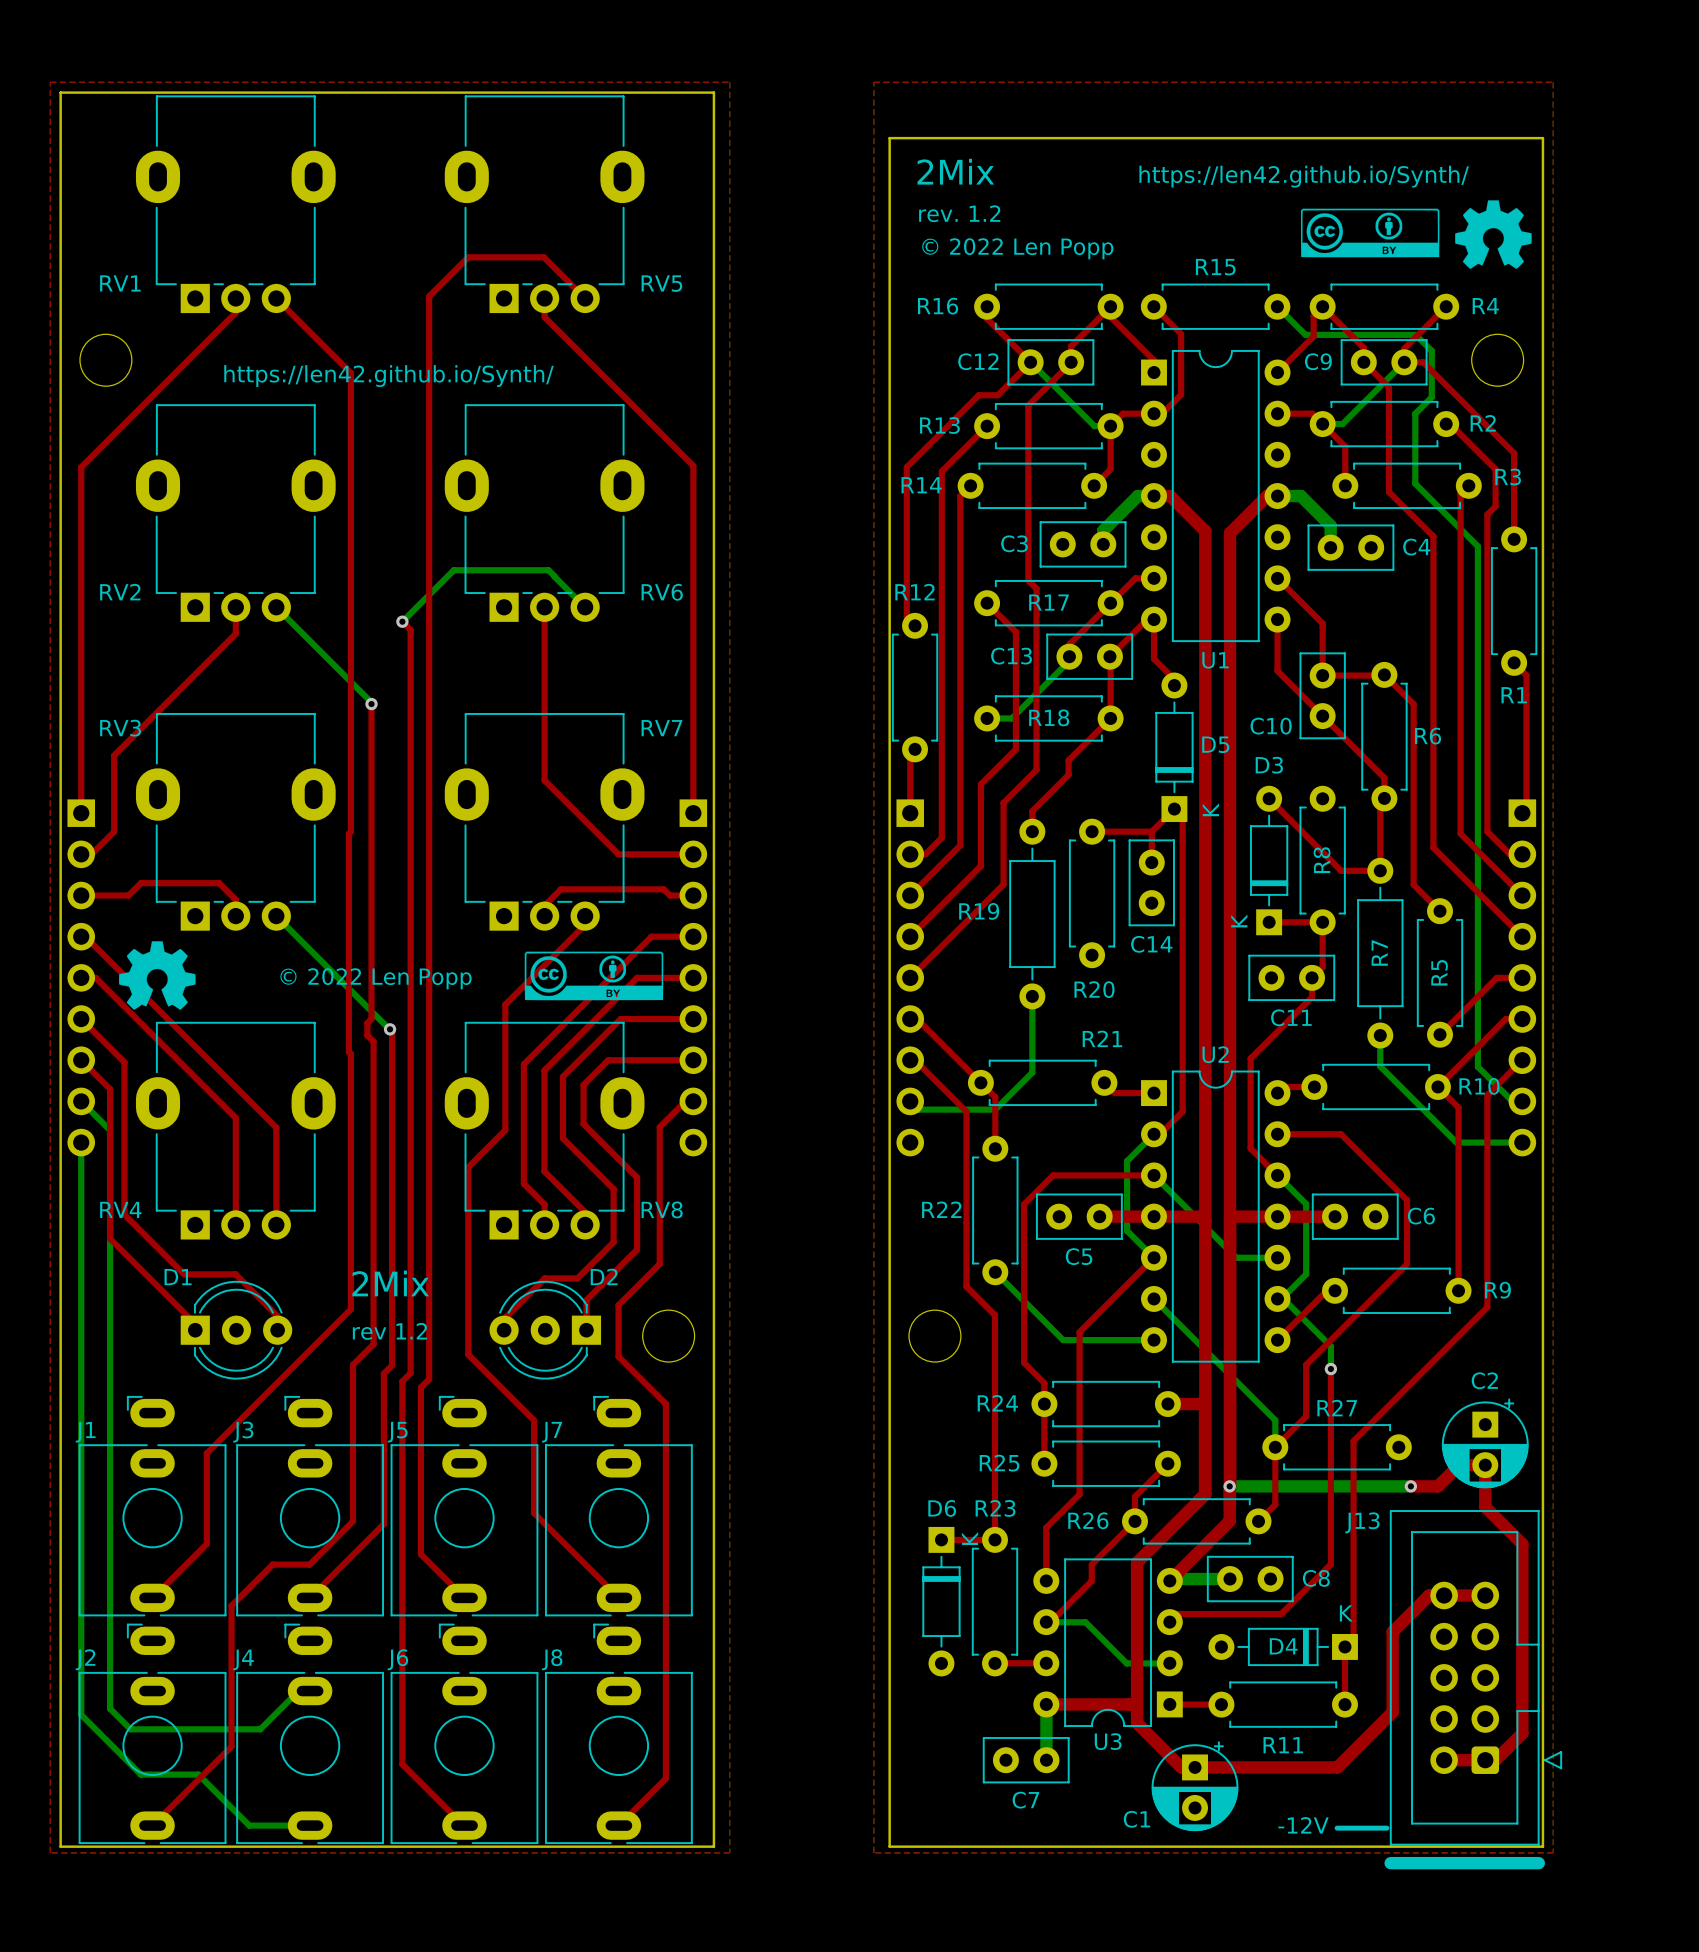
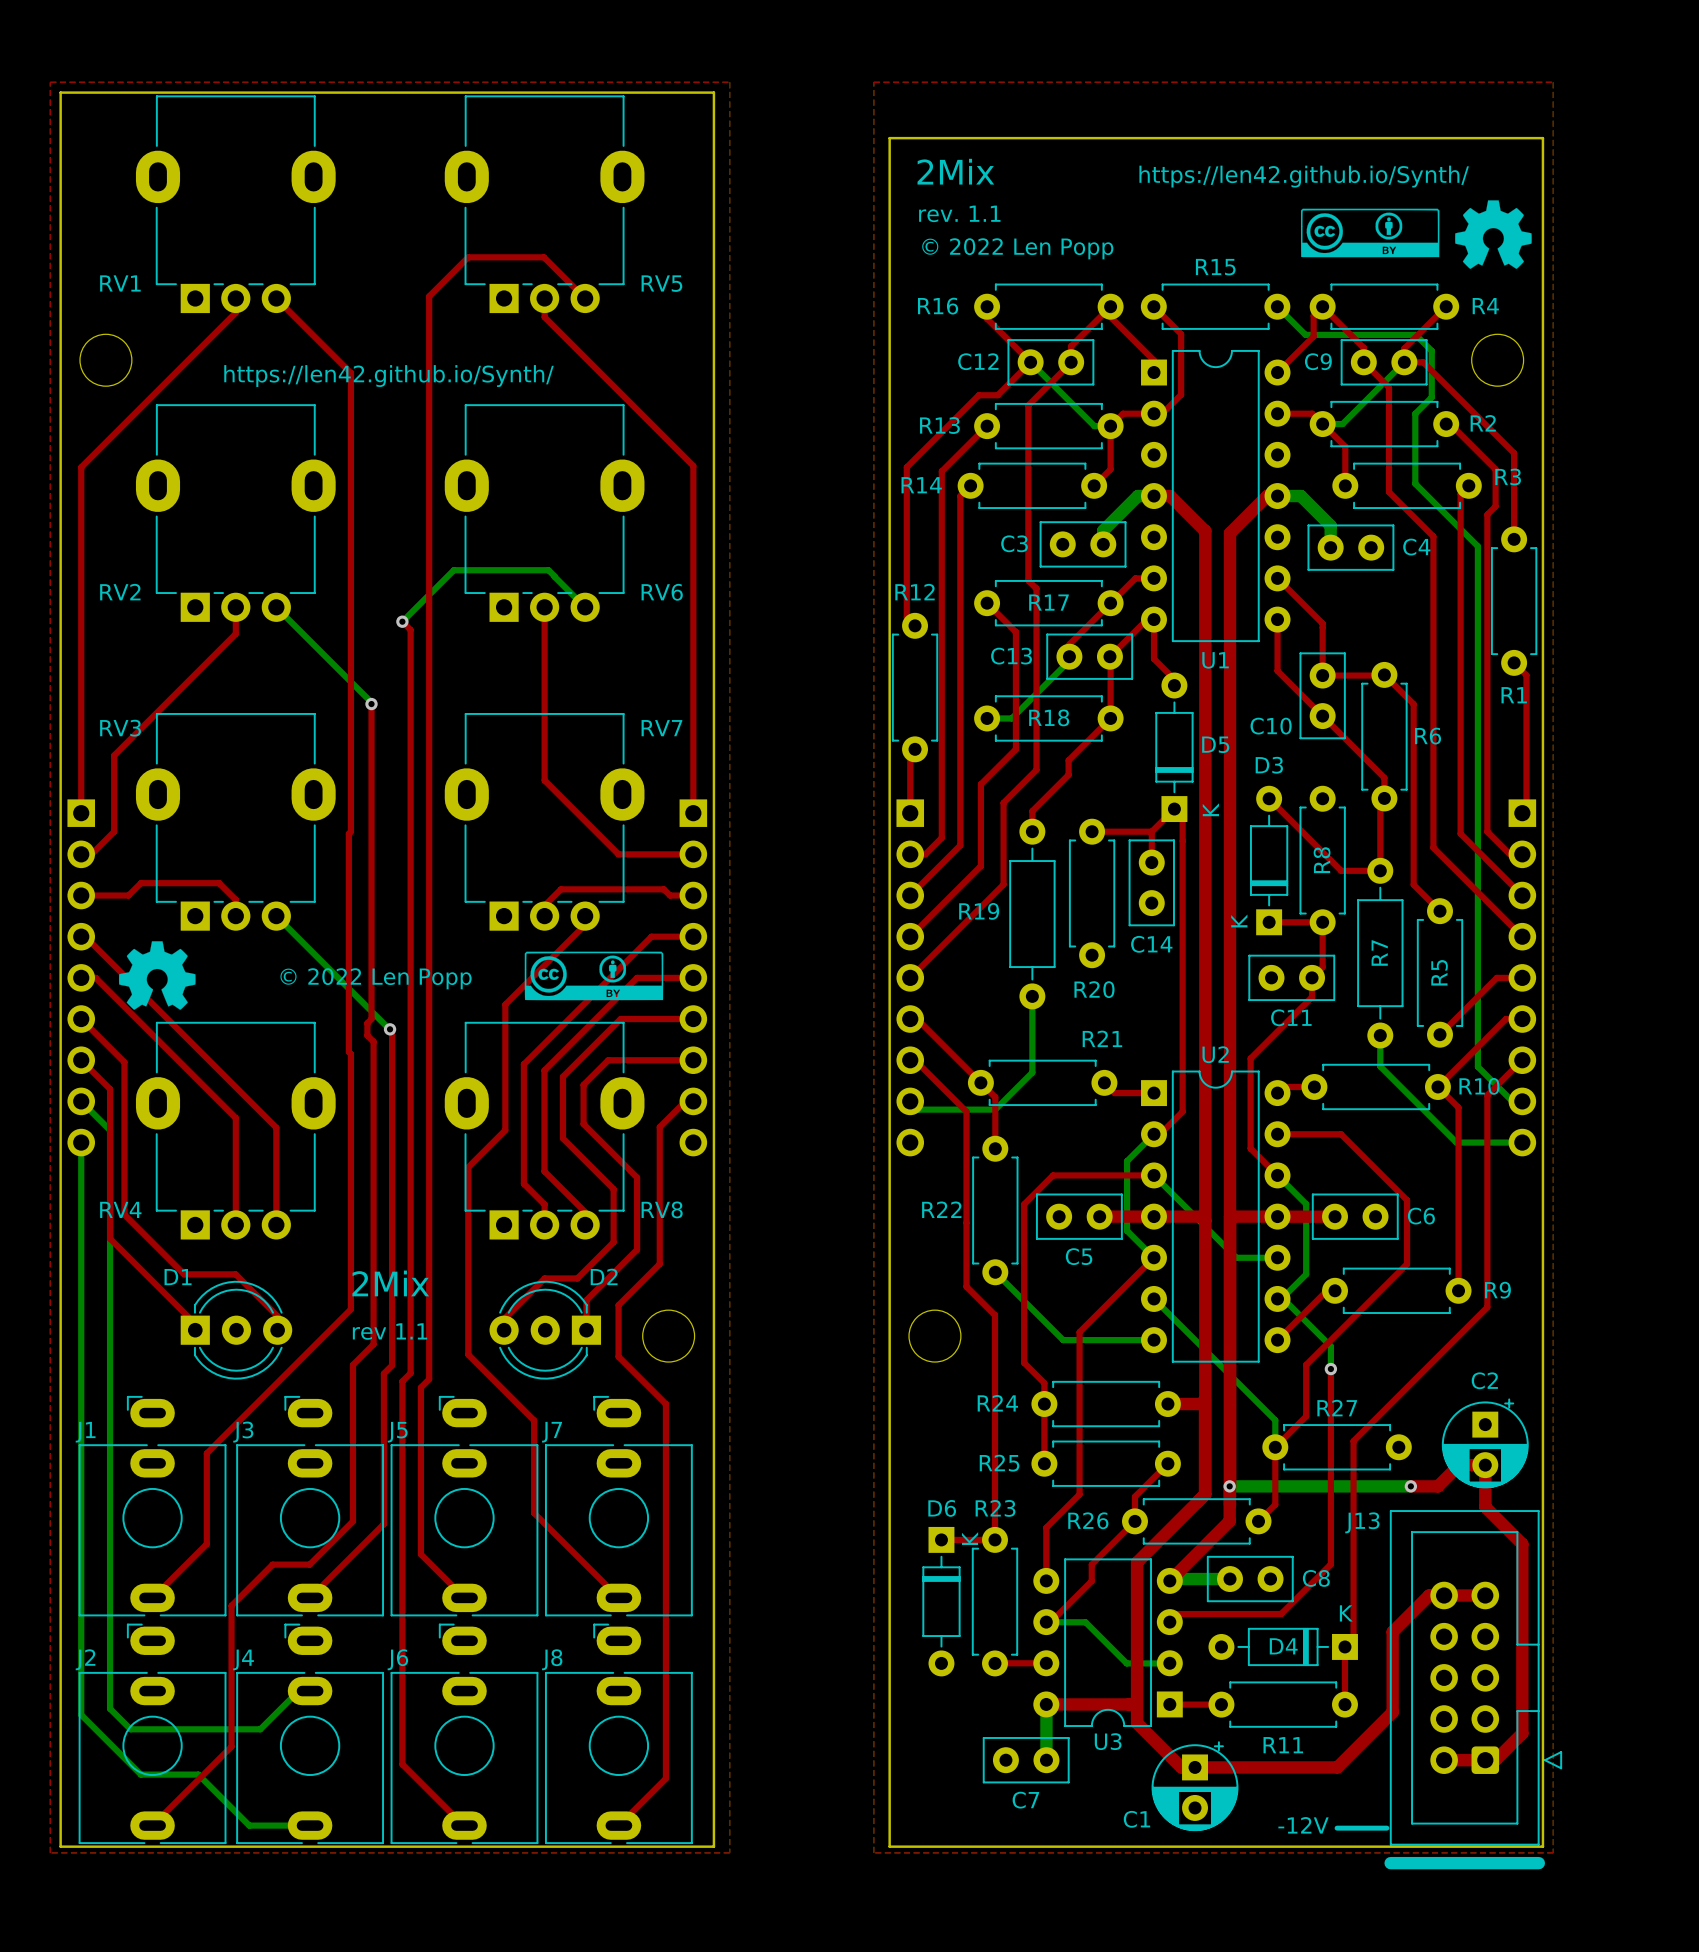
text: rev. 1.2 (959, 213) -> rev. 1.1 (959, 213)
text: rev 1.2 (389, 1331) -> rev 1.1 (390, 1331)

